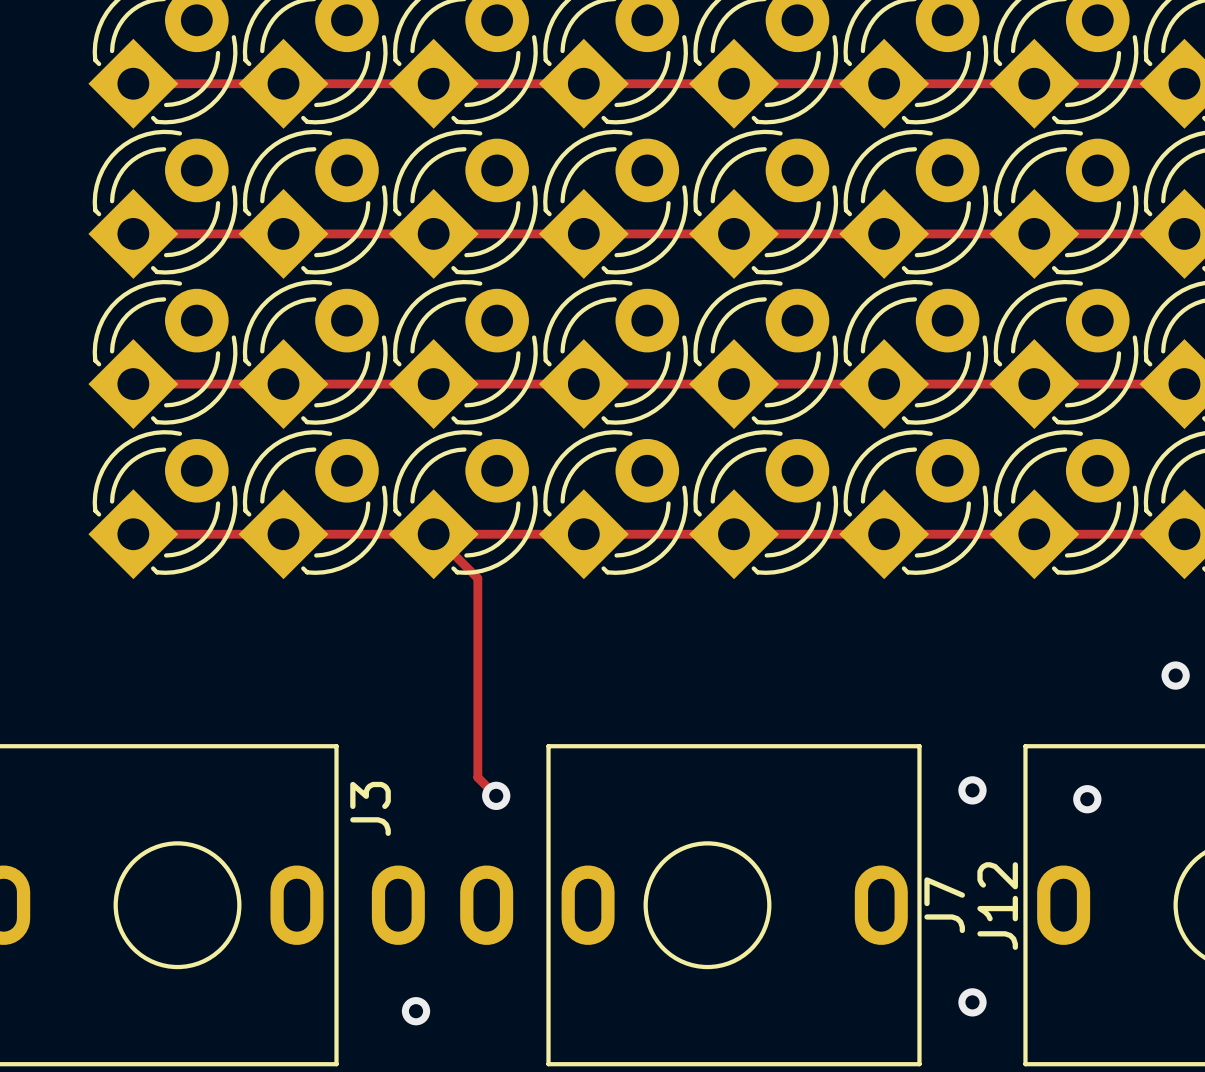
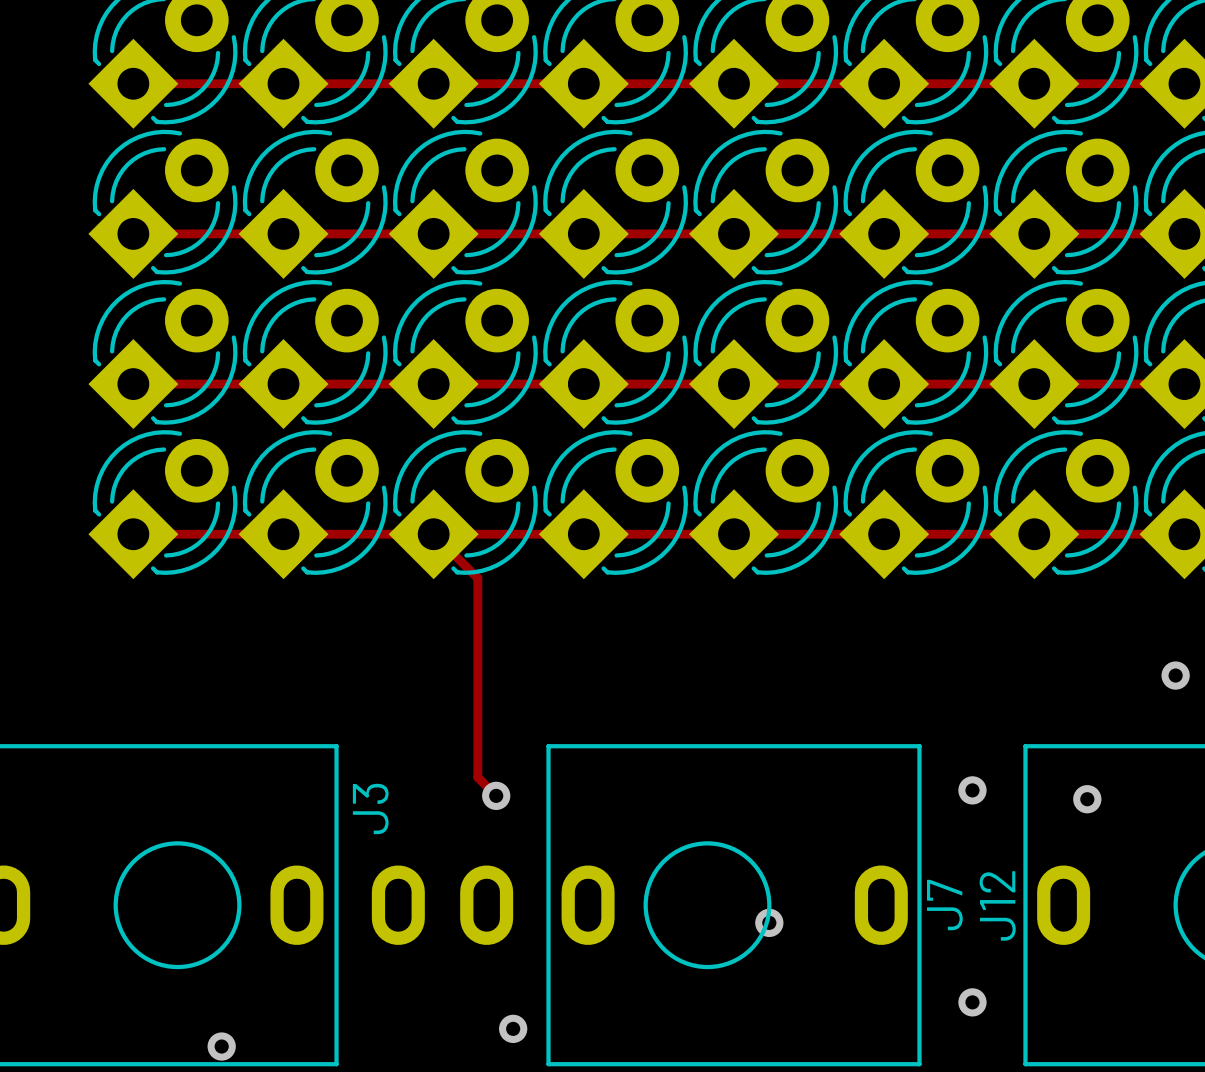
via: none -> (769, 922)
via: (416, 1011) -> none
via: none -> (513, 1028)
via: none -> (221, 1046)

